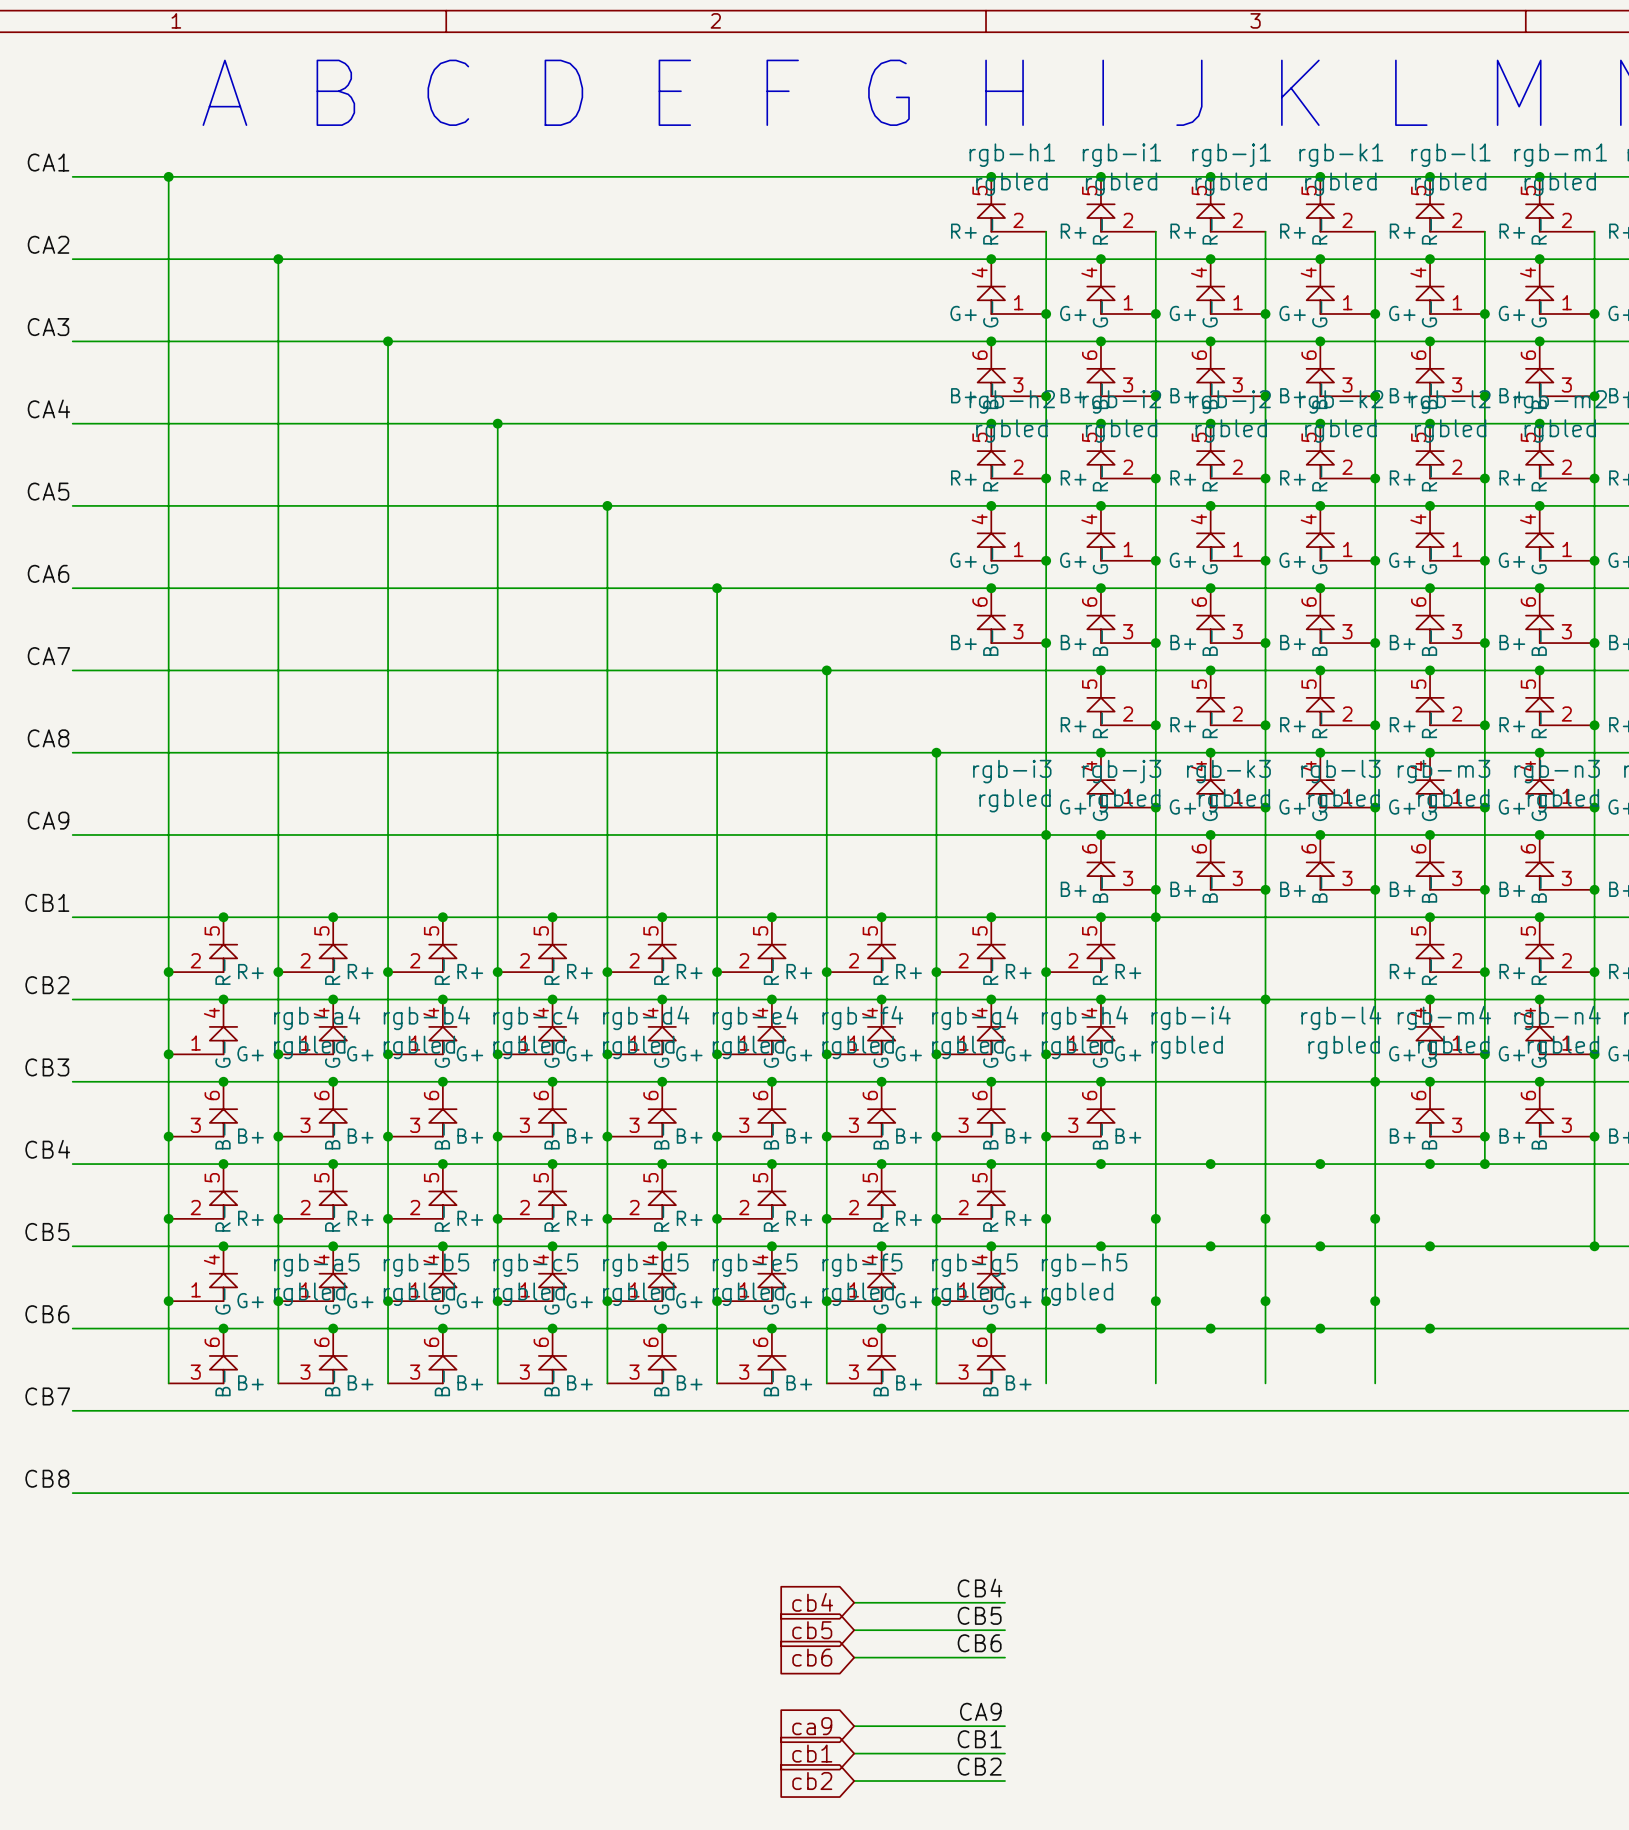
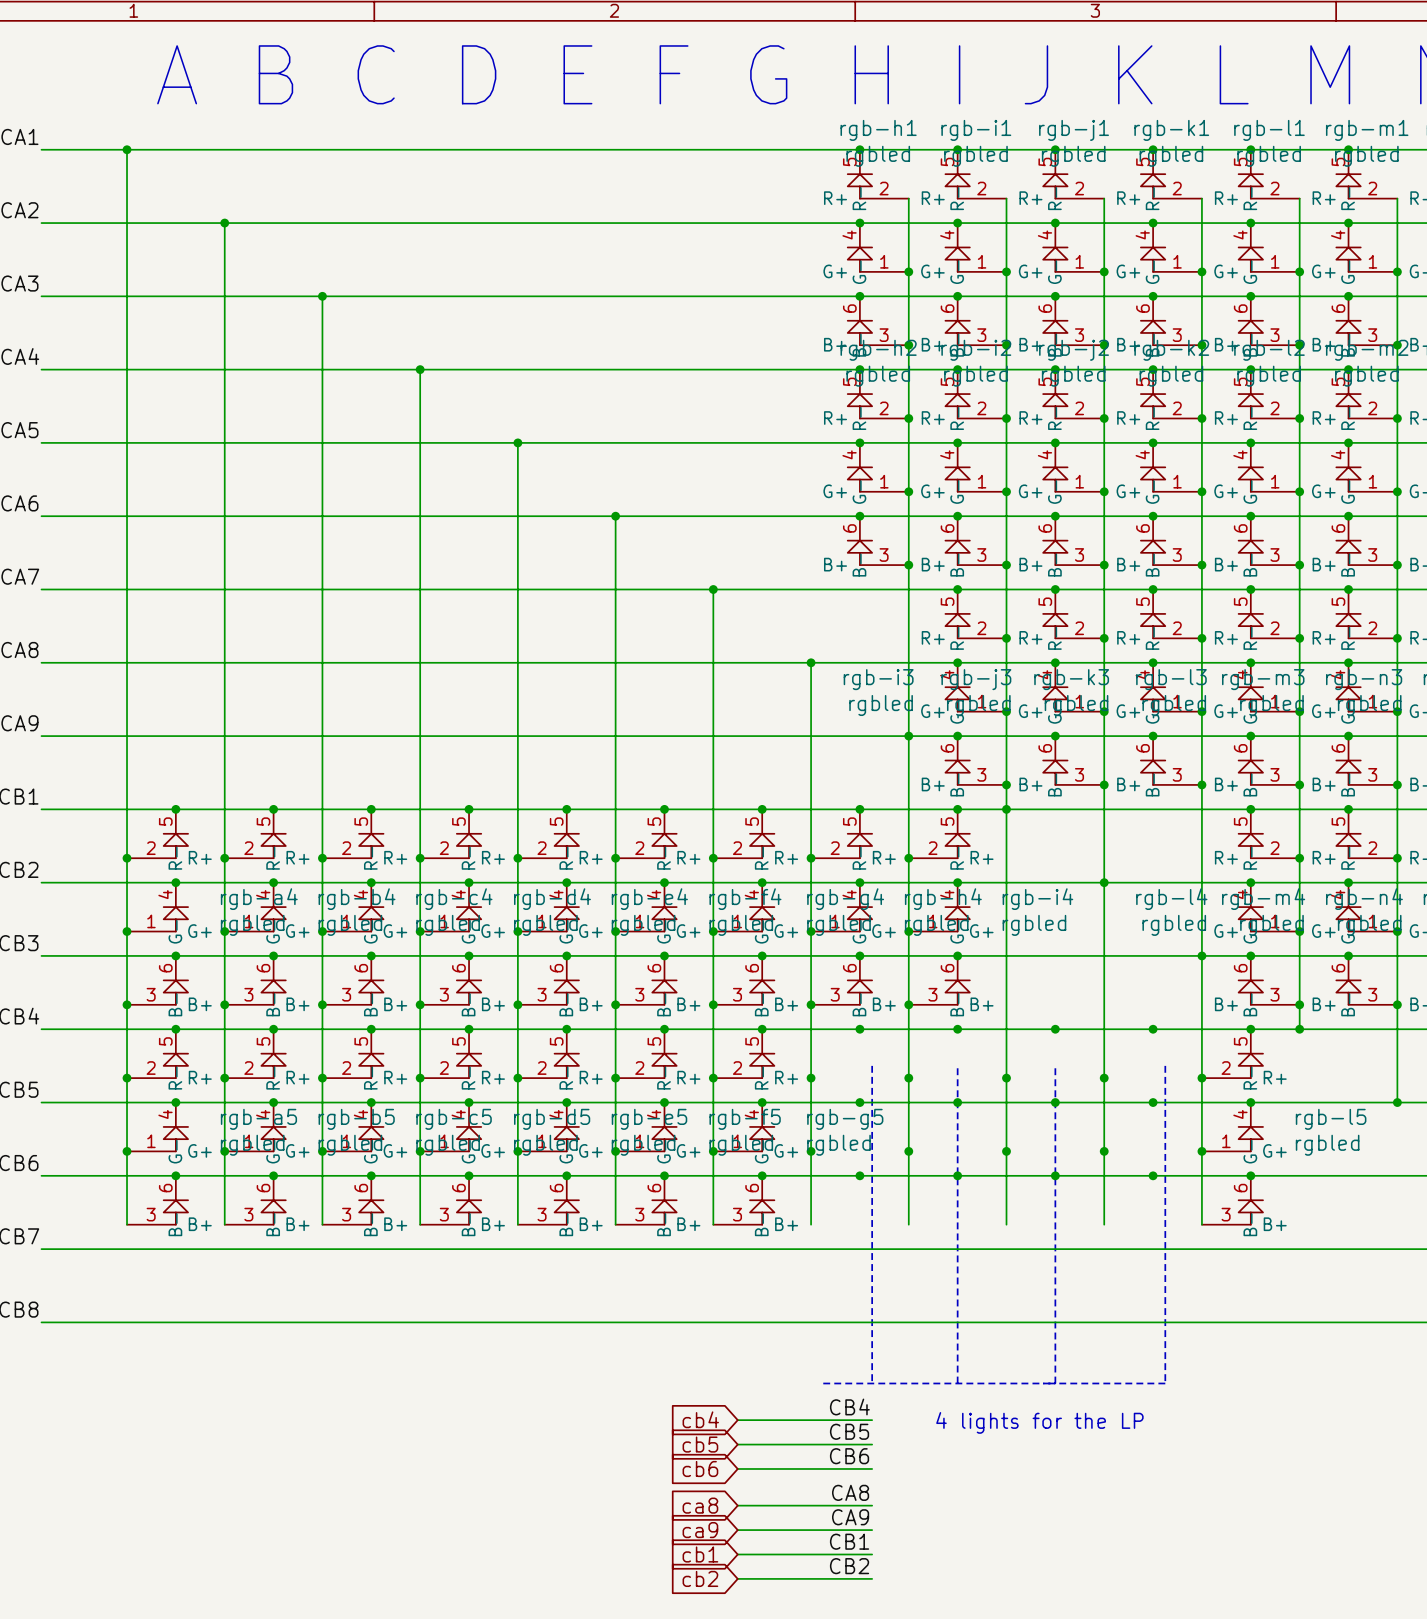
line: none -> (872, 1065) (872, 1383)
line: none -> (957, 1065) (957, 1383)
line: none -> (1055, 1065) (1055, 1383)
line: none -> (1165, 1065) (1165, 1383) (823, 1383)
rgb-h5: rgbled (970, 1273) -> none
rgb-l5: none -> rgbled (1232, 1126)
text: none -> 4 lights for the LP (1039, 1422)
label: none -> CA8 (850, 1492)
global label: none -> ca8 (700, 1505)
wire: none -> (737, 1505) (872, 1505)

